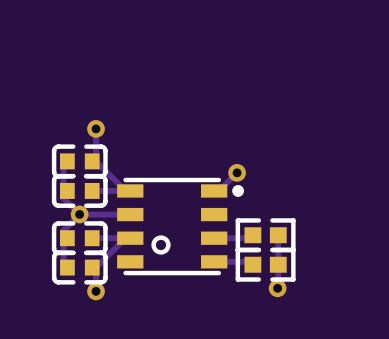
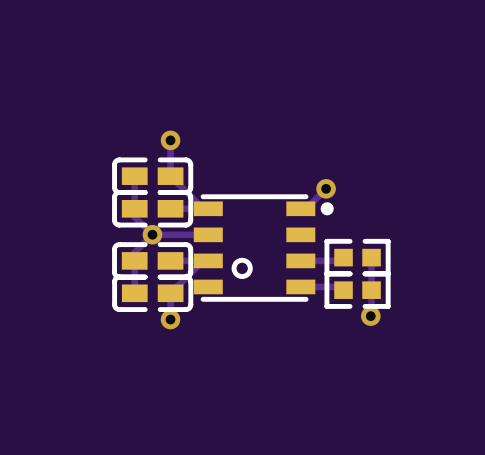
part footprint: [51, 144, 108, 179] -> [112, 157, 194, 195]
part footprint: [51, 173, 108, 208] -> [112, 190, 194, 228]
part footprint: [51, 221, 108, 256] -> [112, 242, 194, 280]
part footprint: [51, 250, 108, 285] -> [112, 274, 194, 313]

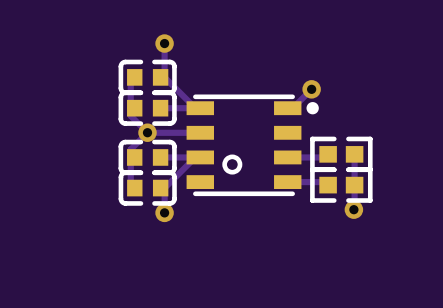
part footprint: [112, 157, 194, 195] -> [118, 59, 177, 96]
part footprint: [112, 190, 194, 228] -> [118, 90, 177, 126]
part footprint: [112, 242, 194, 280] -> [118, 139, 177, 176]
part footprint: [112, 274, 194, 313] -> [118, 170, 177, 206]

